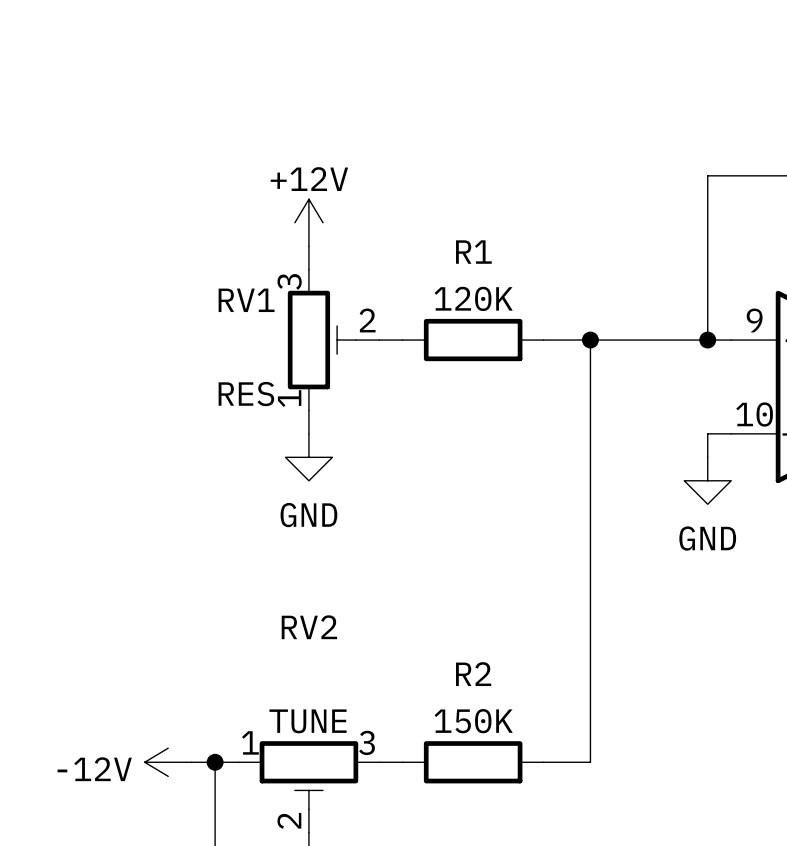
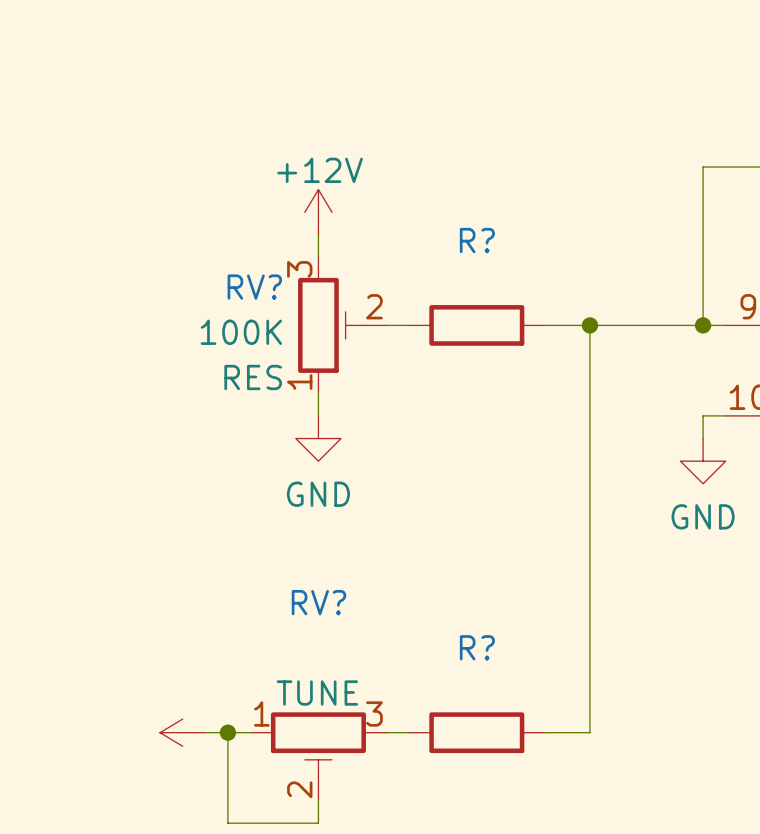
R1 name: R1 (473, 252) -> R? (477, 240)
R1 value: 120K (473, 298) -> none
RV1 name: RV1 (246, 300) -> RV? (254, 287)
RV1 value: none -> 100K (241, 332)
RV2 name: RV2 (309, 627) -> RV? (318, 602)
R2 name: R2 (473, 674) -> R? (477, 647)
R2 value: 150K (473, 721) -> none
power symbol text: -12V (94, 769) -> none

